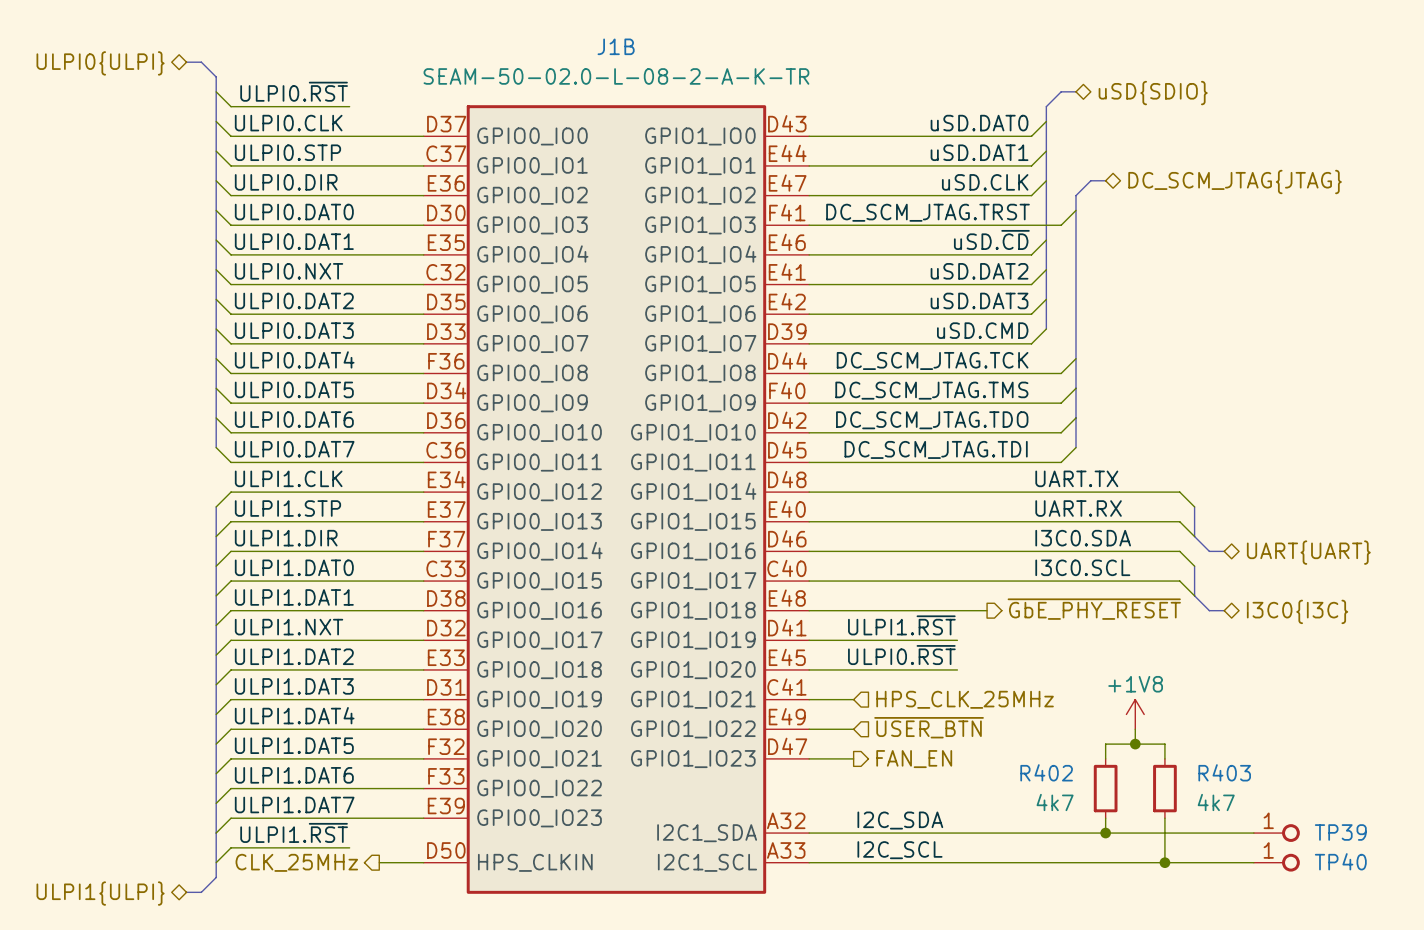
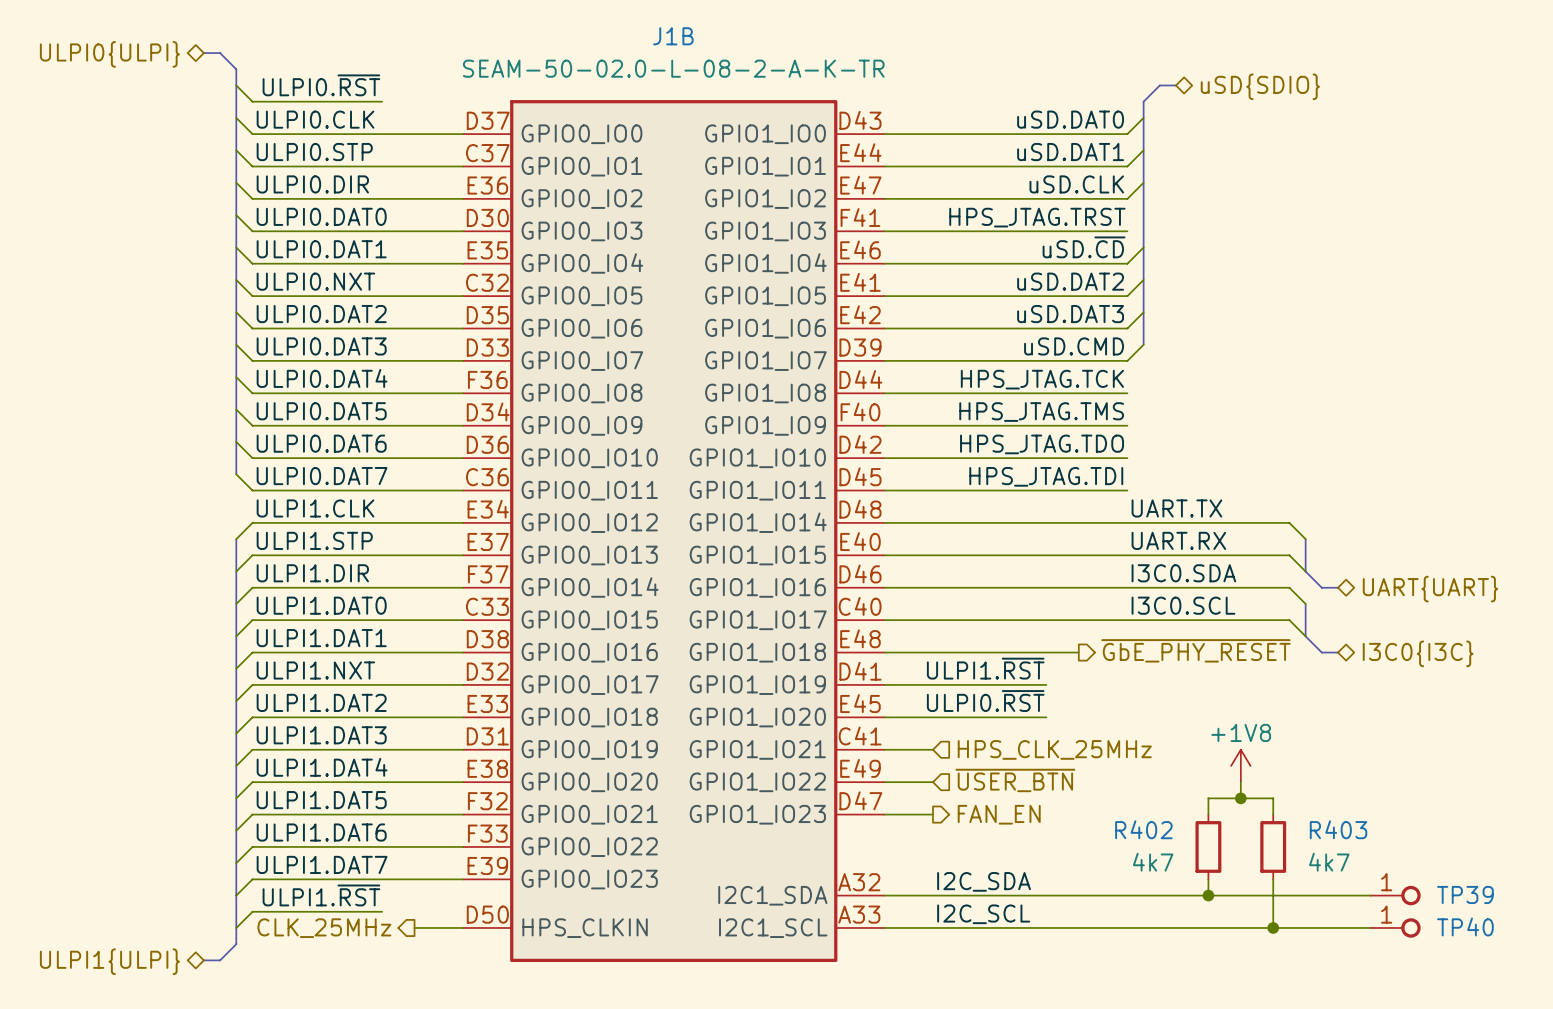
bus: (1105, 180) (1090, 180) (1076, 195) (1076, 447) -> none
hierarchical label: DC_SCM_JTAG{JTAG} (1235, 182) -> none
wire: (1076, 210) (1061, 225) (1031, 225) -> none
label: DC_SCM_JTAG.TRST (928, 212) -> HPS_JTAG.TRST (1037, 217)
wire: (1076, 358) (1061, 373) (1031, 373) -> none
label: DC_SCM_JTAG.TCK (932, 360) -> HPS_JTAG.TCK (1042, 379)
wire: (1076, 388) (1061, 403) (1031, 403) -> none
label: DC_SCM_JTAG.TMS (931, 390) -> HPS_JTAG.TMS (1041, 412)
wire: (1076, 417) (1061, 432) (1031, 432) -> none
label: DC_SCM_JTAG.TDO (932, 420) -> HPS_JTAG.TDO (1042, 444)
wire: (1076, 447) (1061, 462) (1031, 462) -> none
label: DC_SCM_JTAG.TDI (936, 449) -> HPS_JTAG.TDI (1046, 476)

